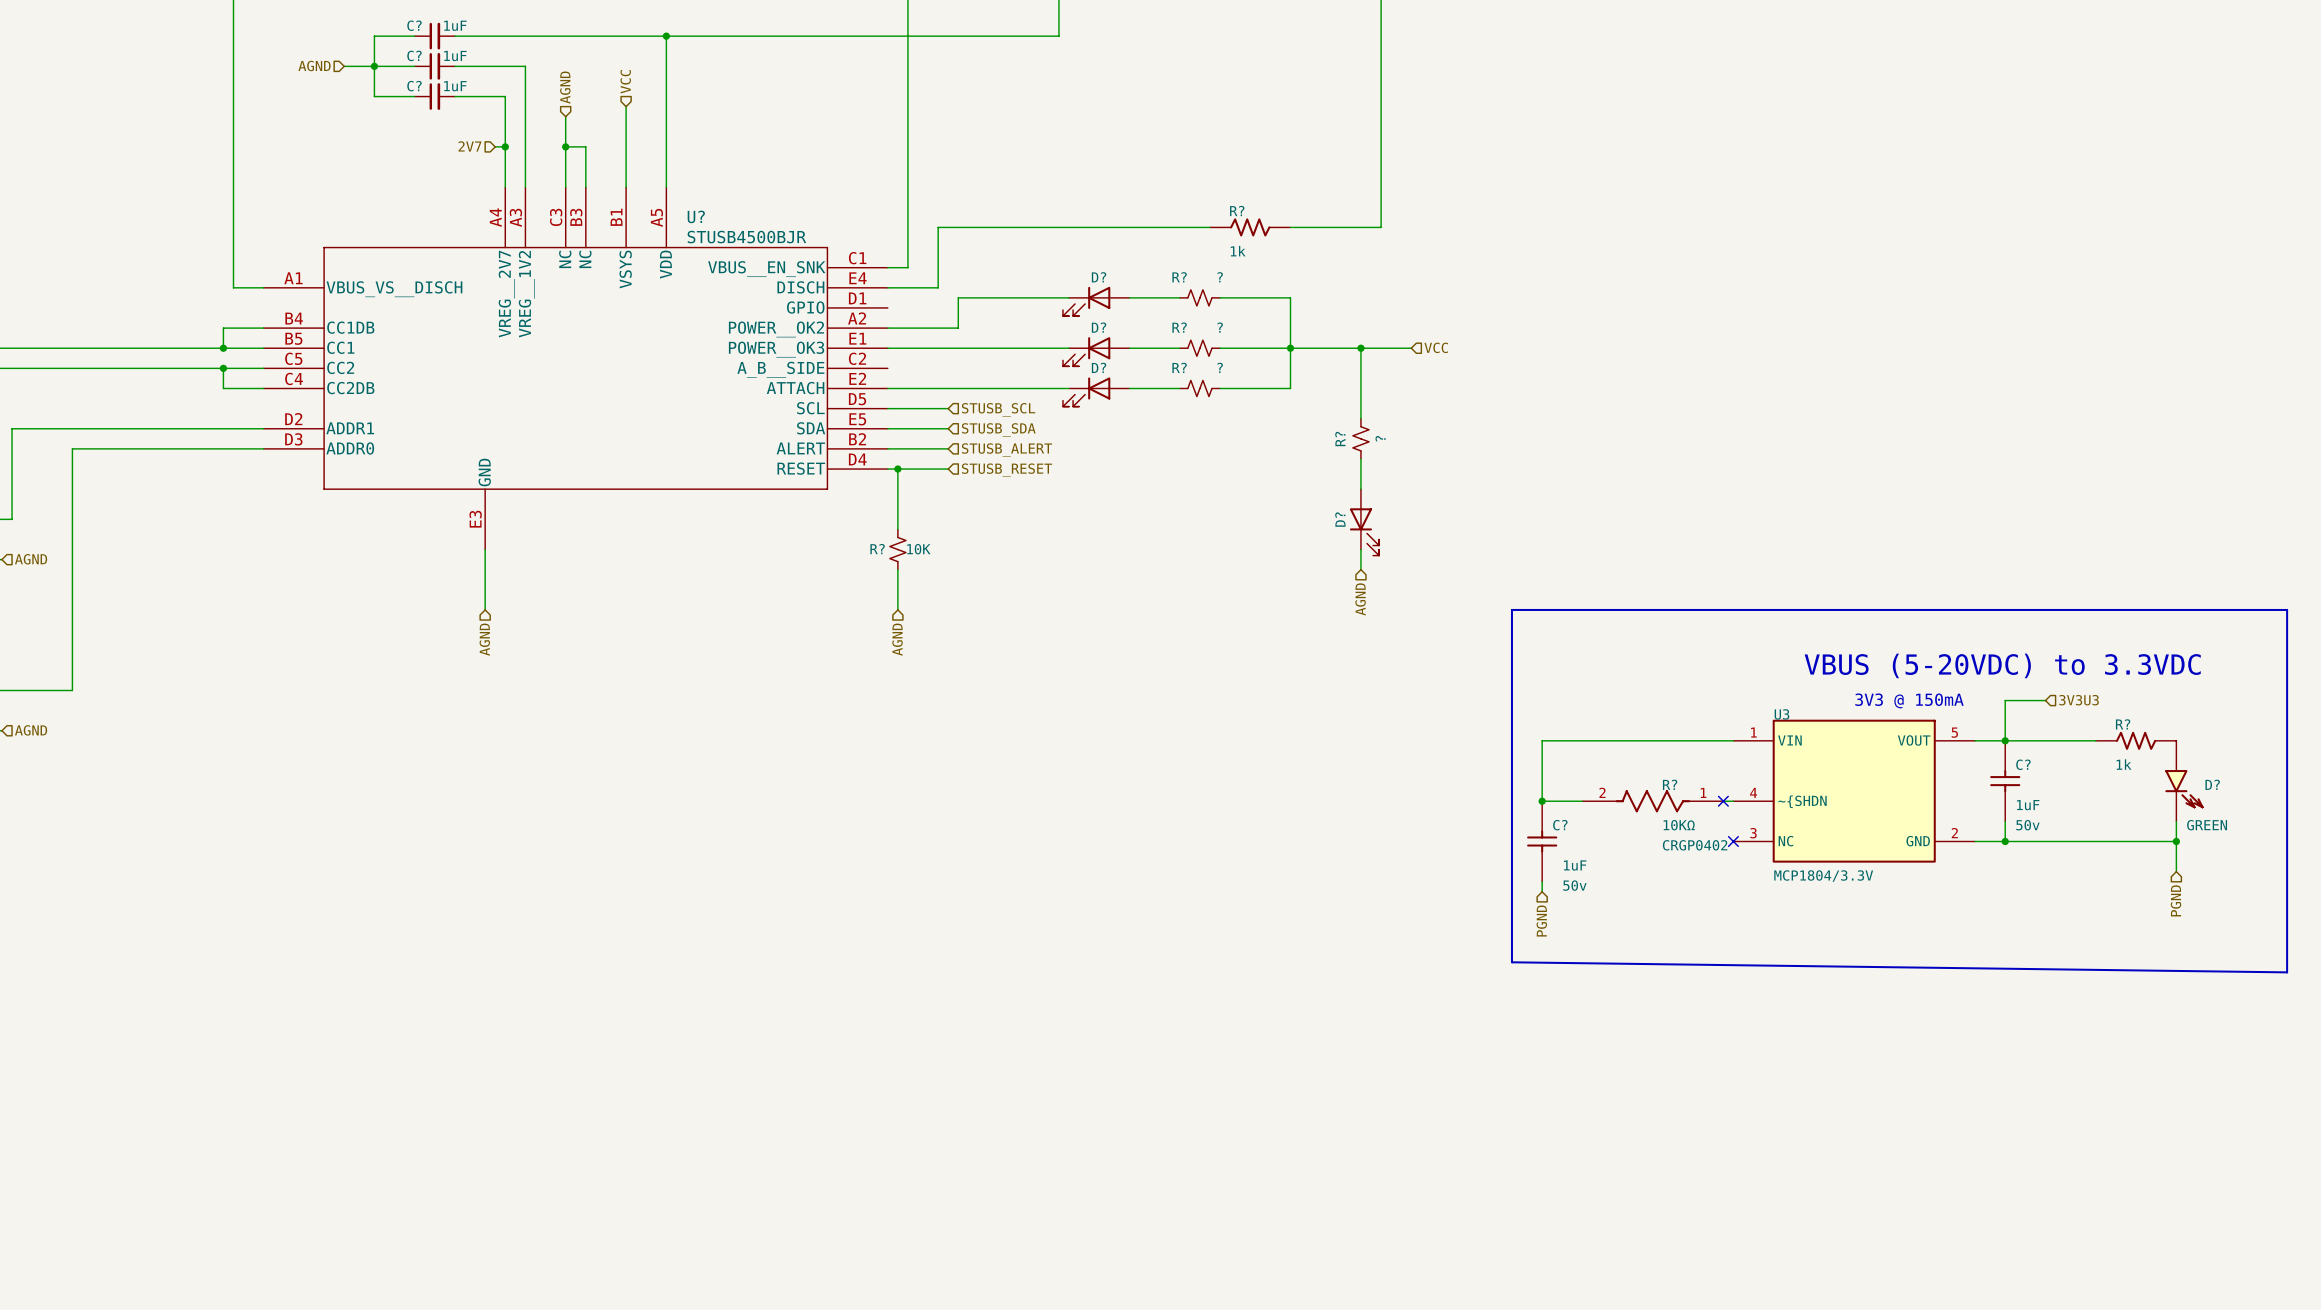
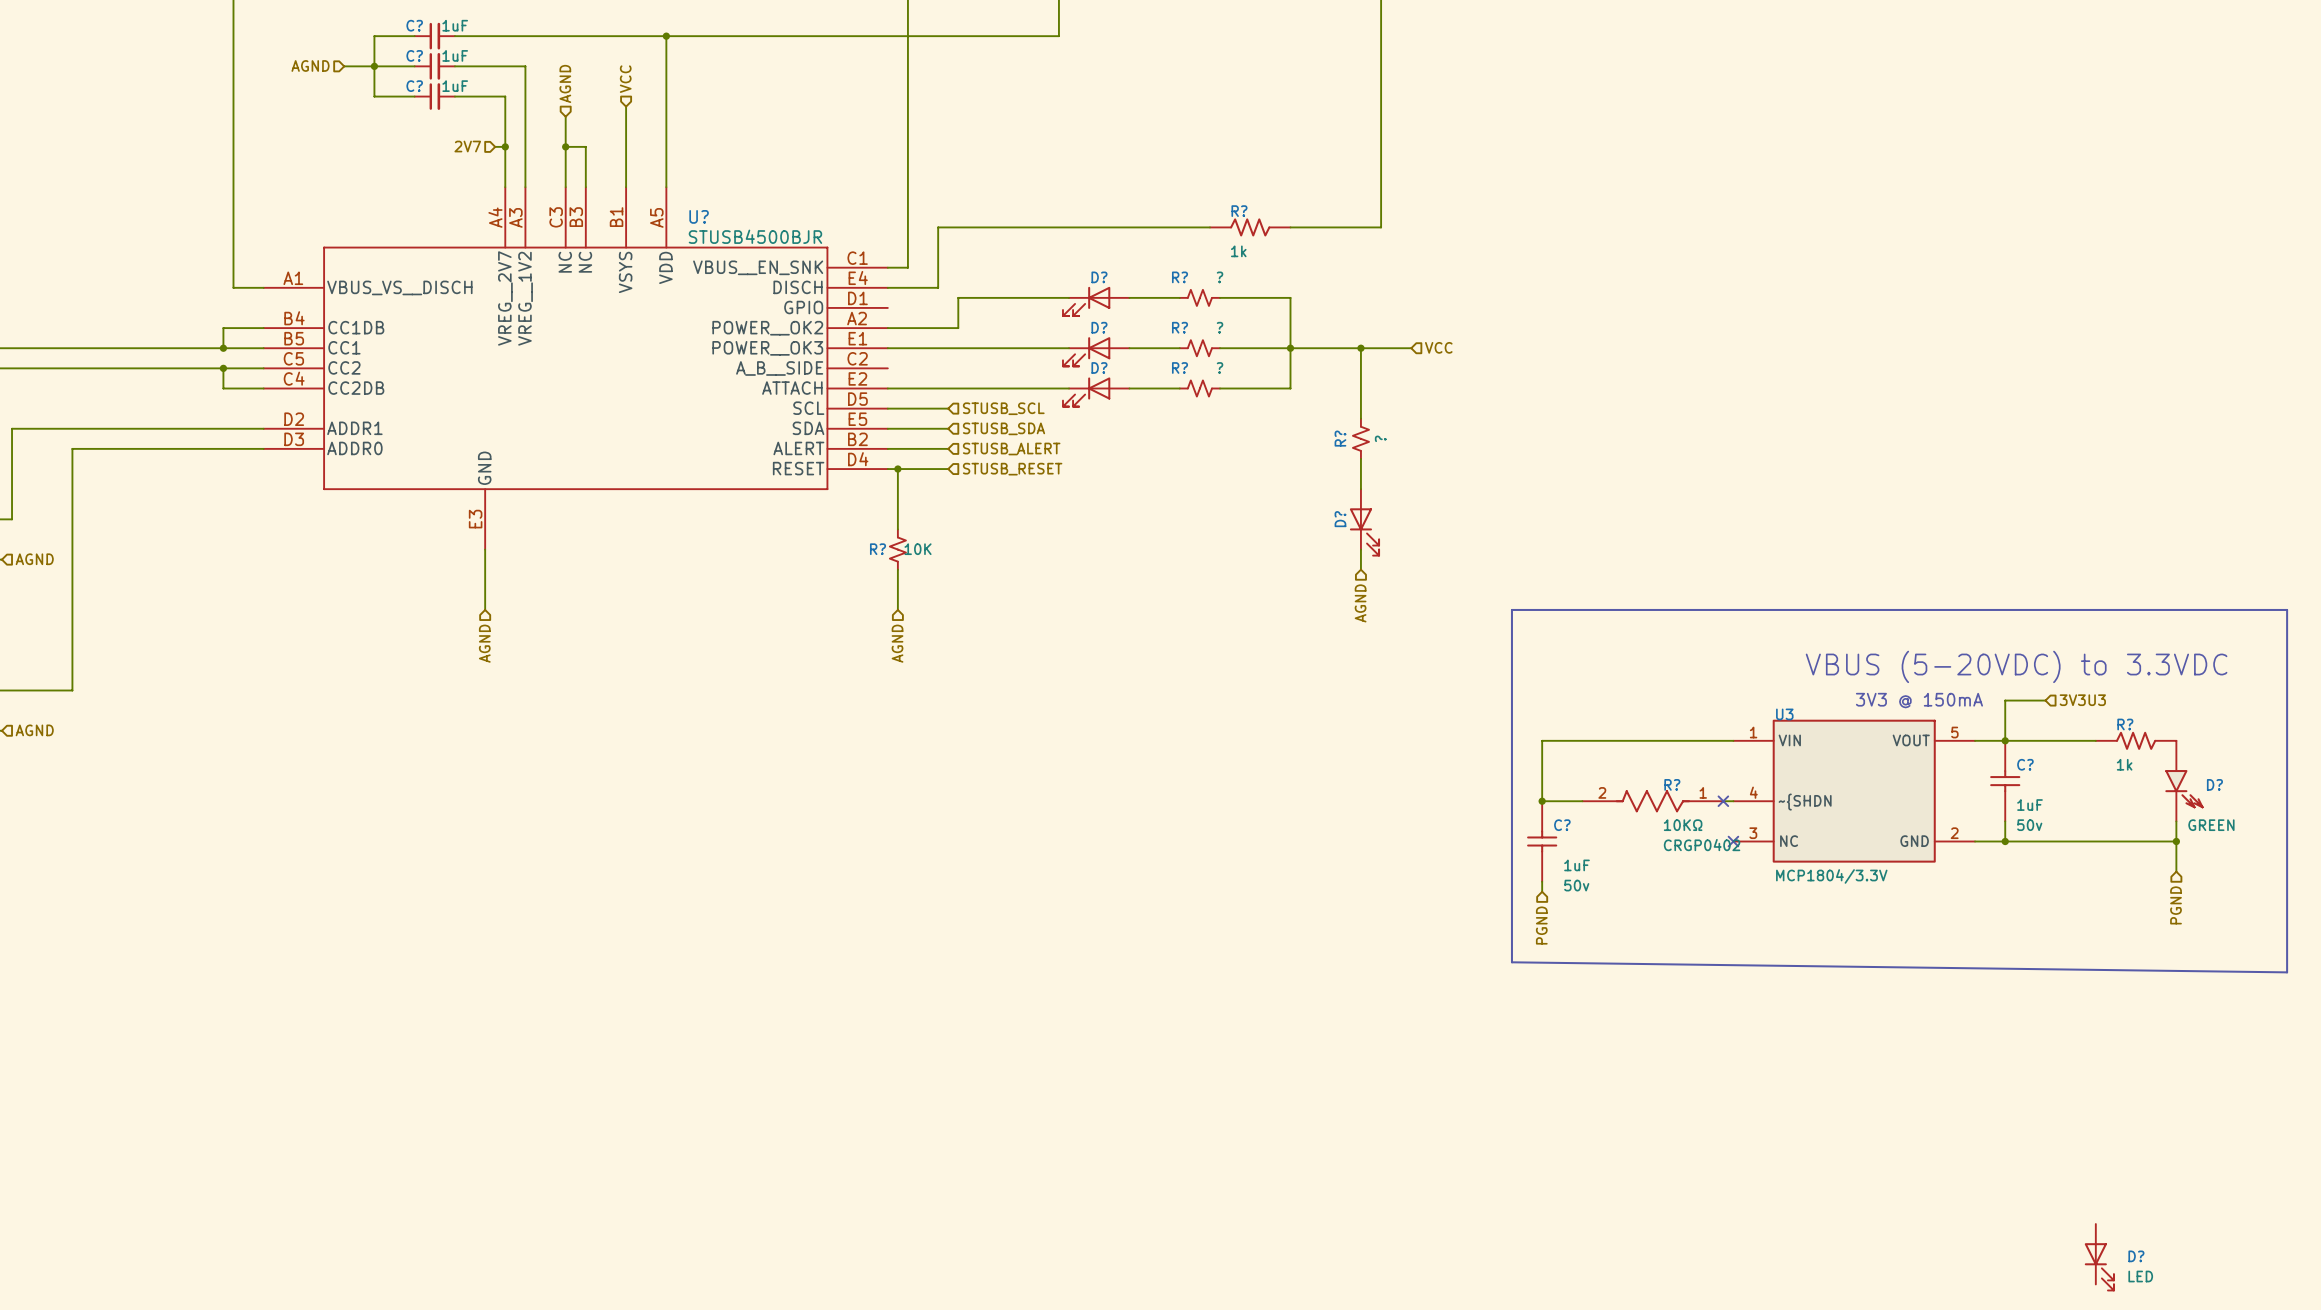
D?: none -> LED (2099, 1257)

